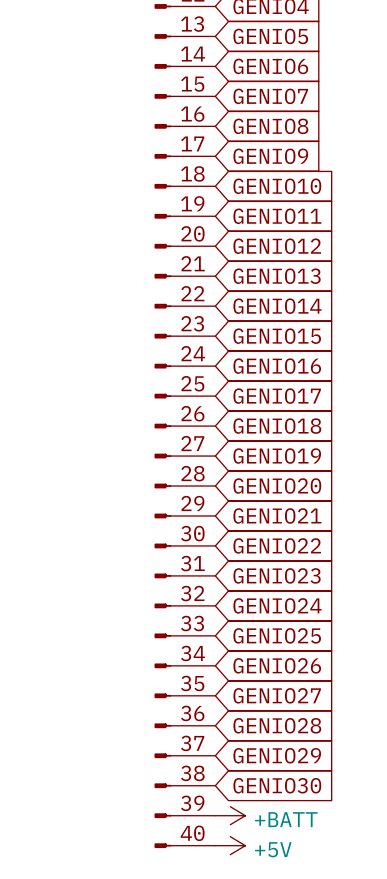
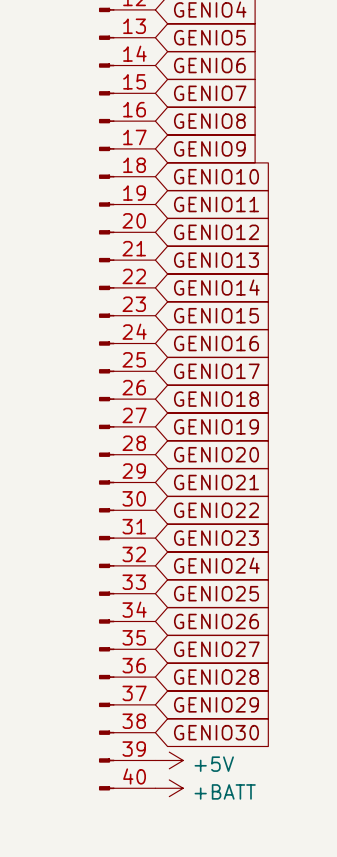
power symbol: +BATT (230, 815) -> +5V (169, 760)
power symbol: +5V (230, 845) -> +BATT (169, 788)

